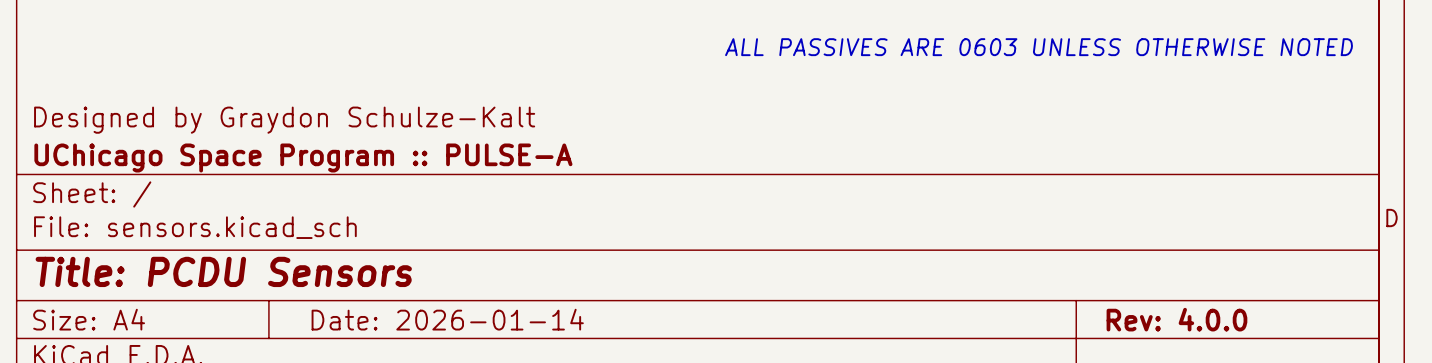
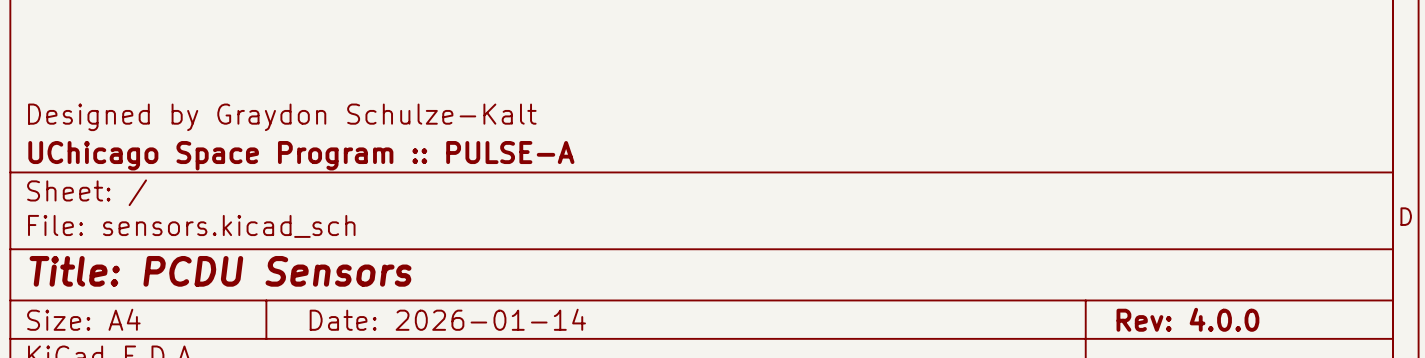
text: ALL PASSIVES ARE 0603 UNLESS OTHERWISE NOTED (1039, 47) -> none

